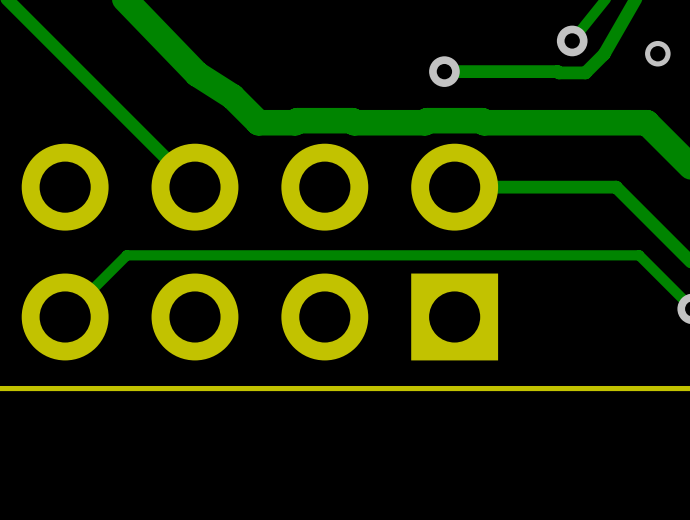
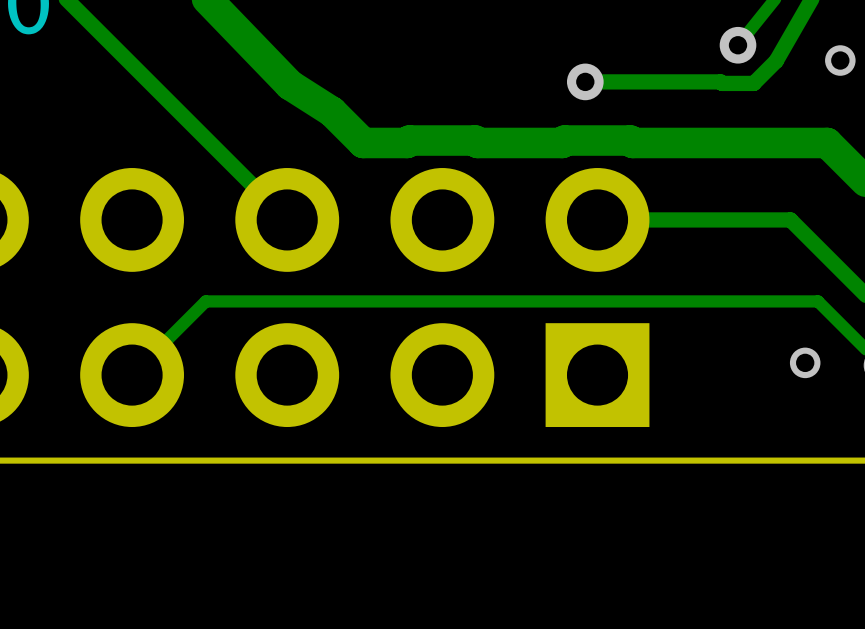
via: none -> (805, 362)

